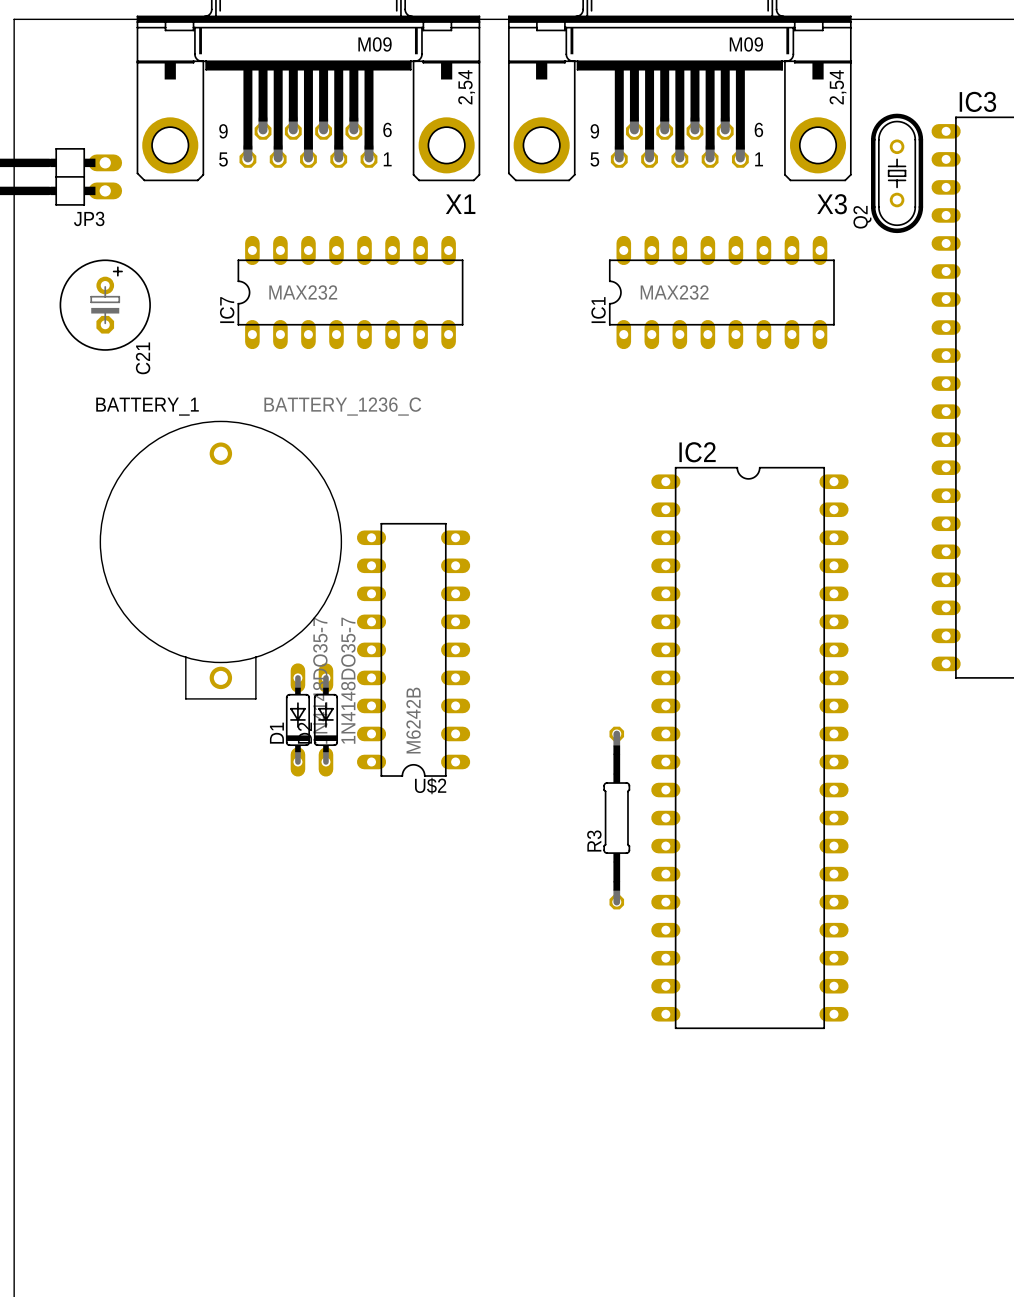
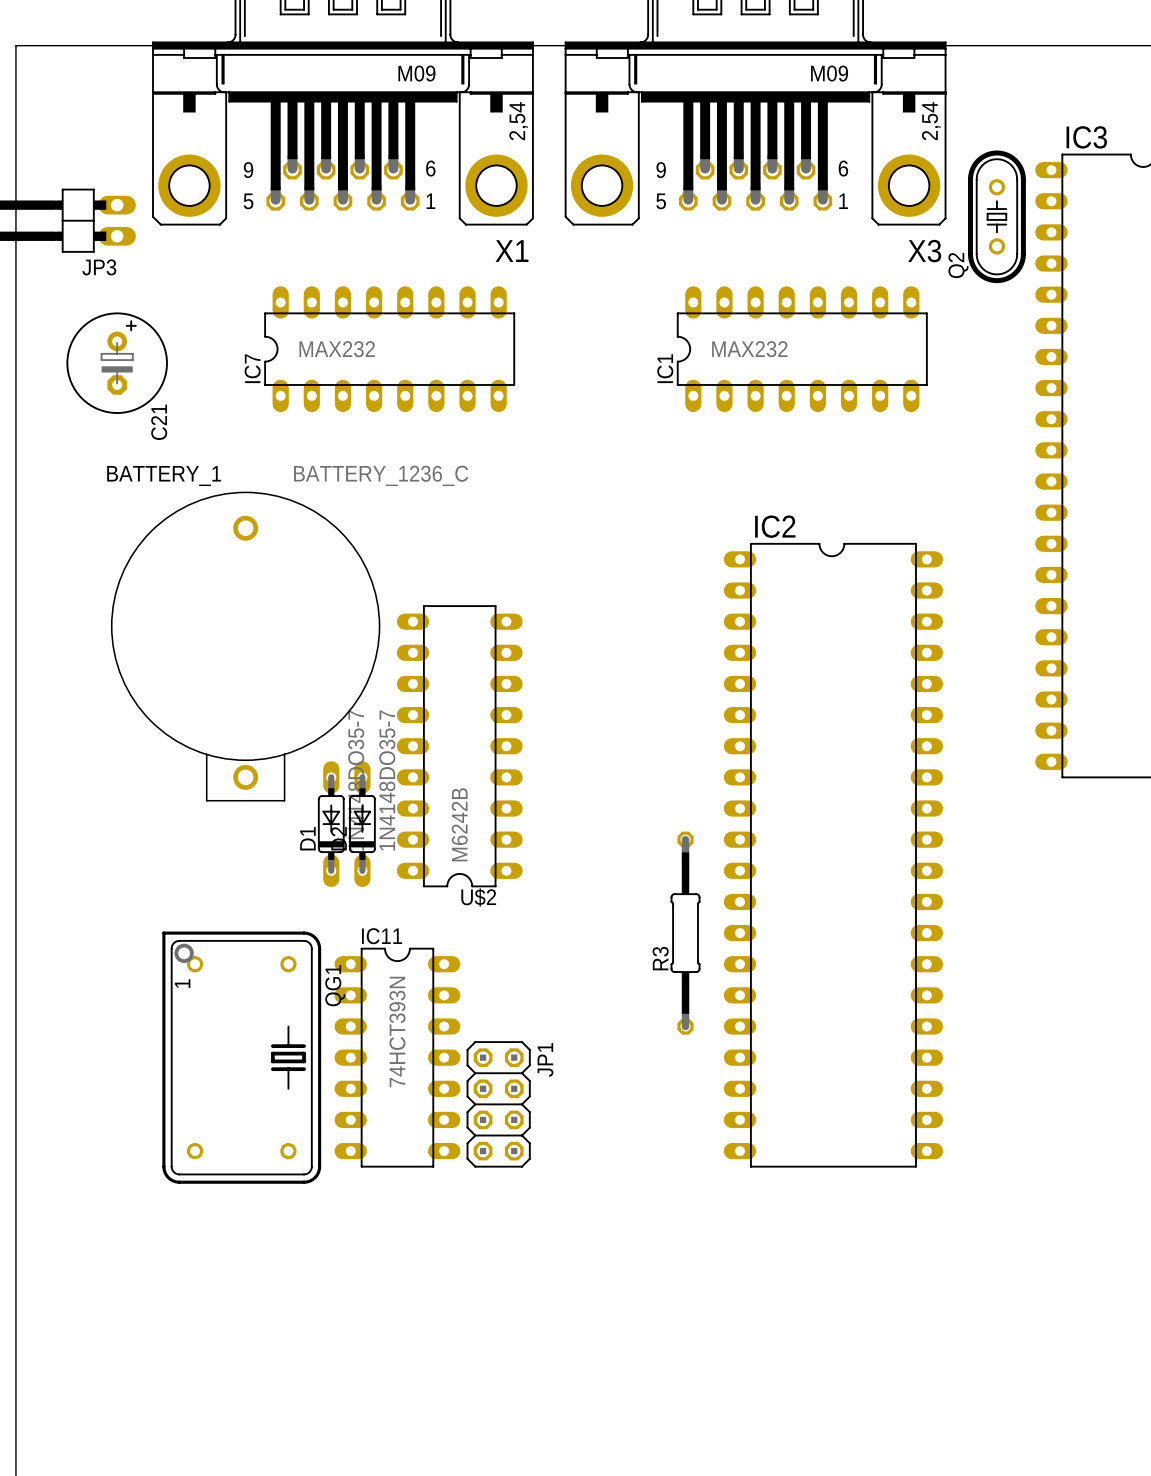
QG1: none -> (241, 1057)
IC11: none -> 74HCT393N (397, 1057)
JP1: none -> (498, 1104)

